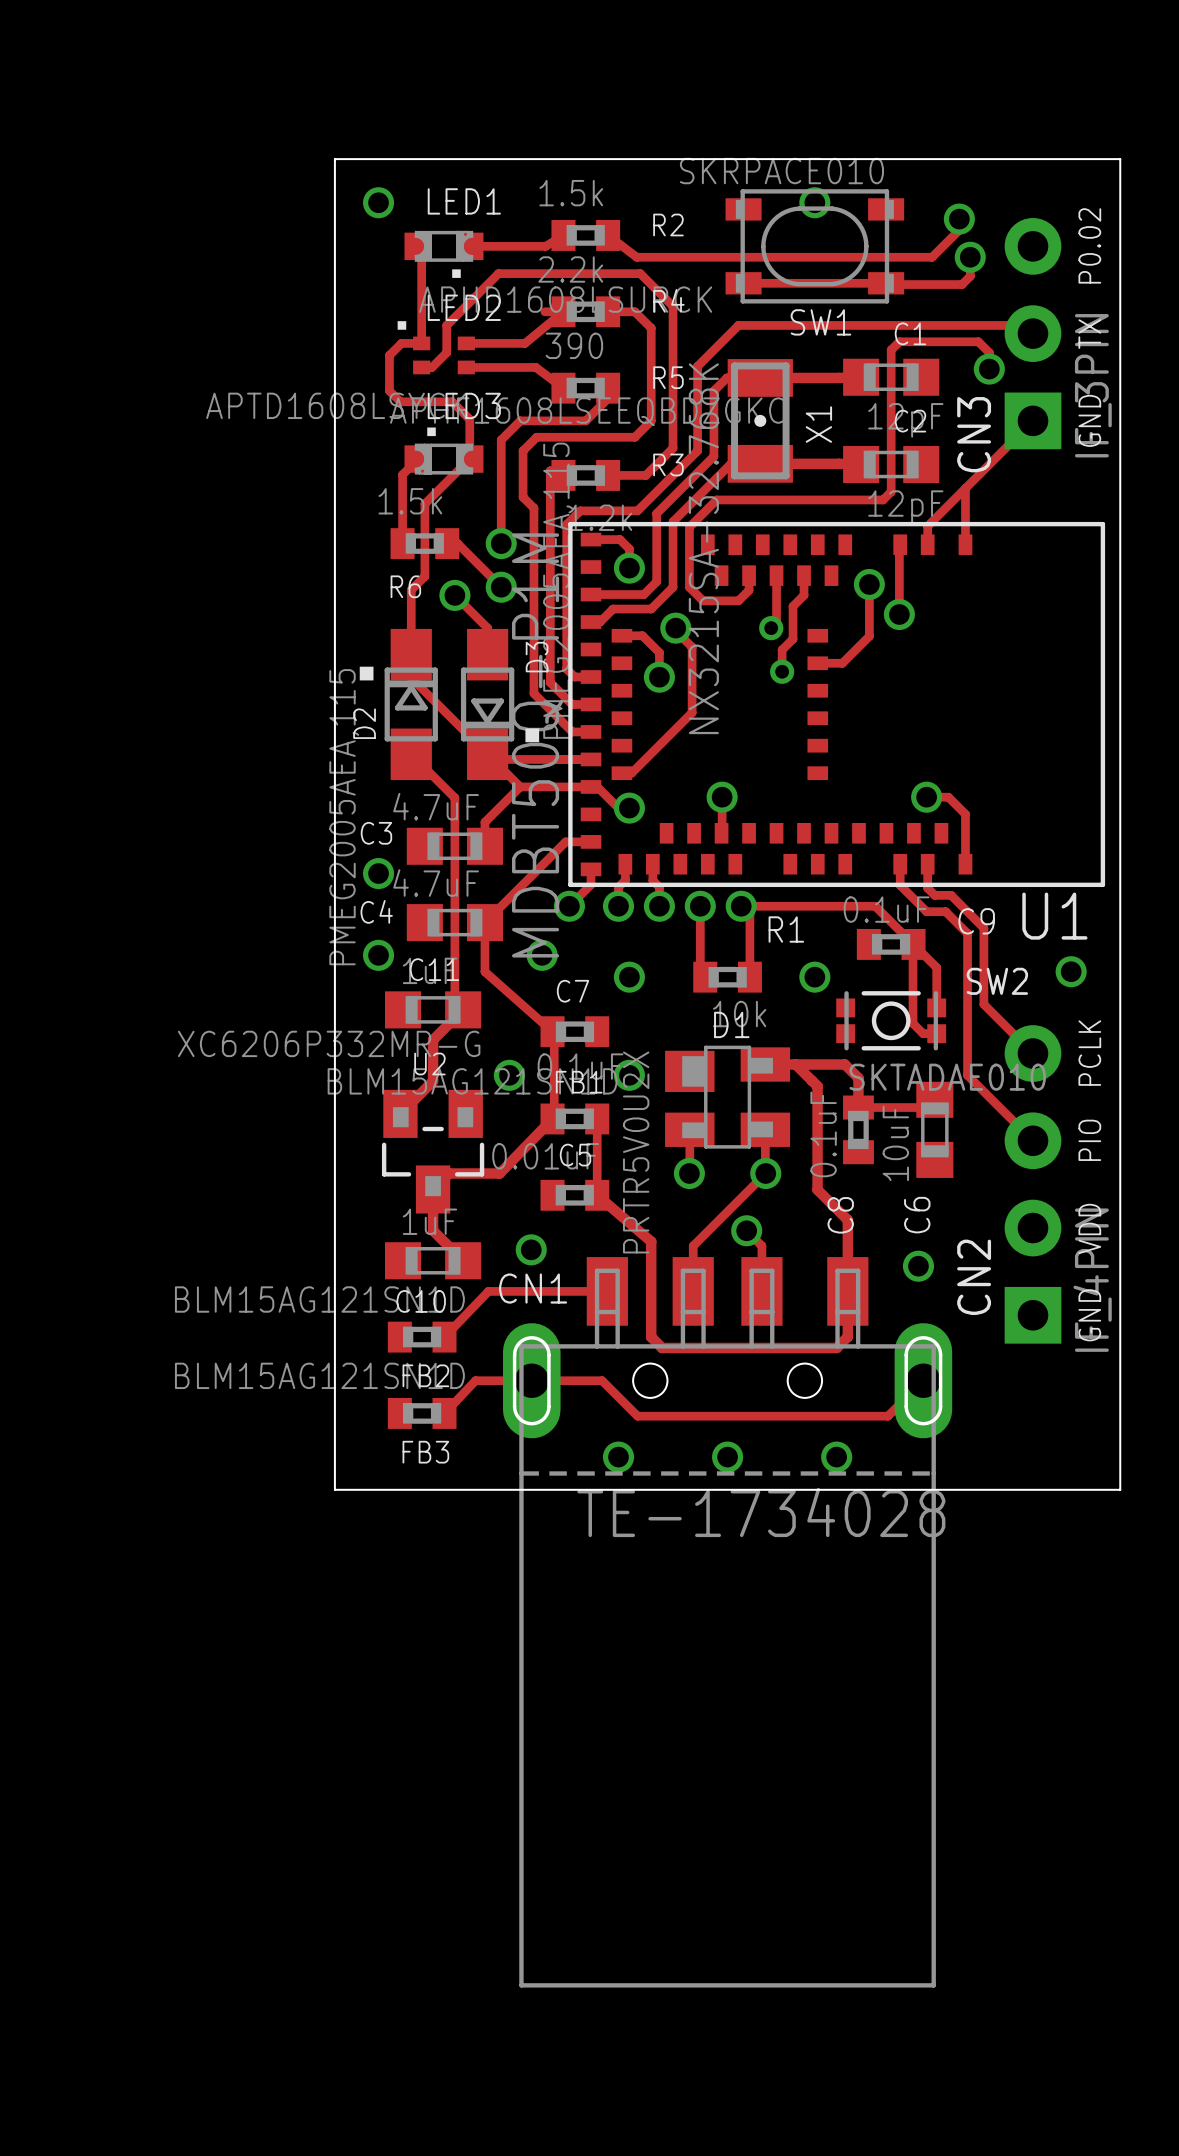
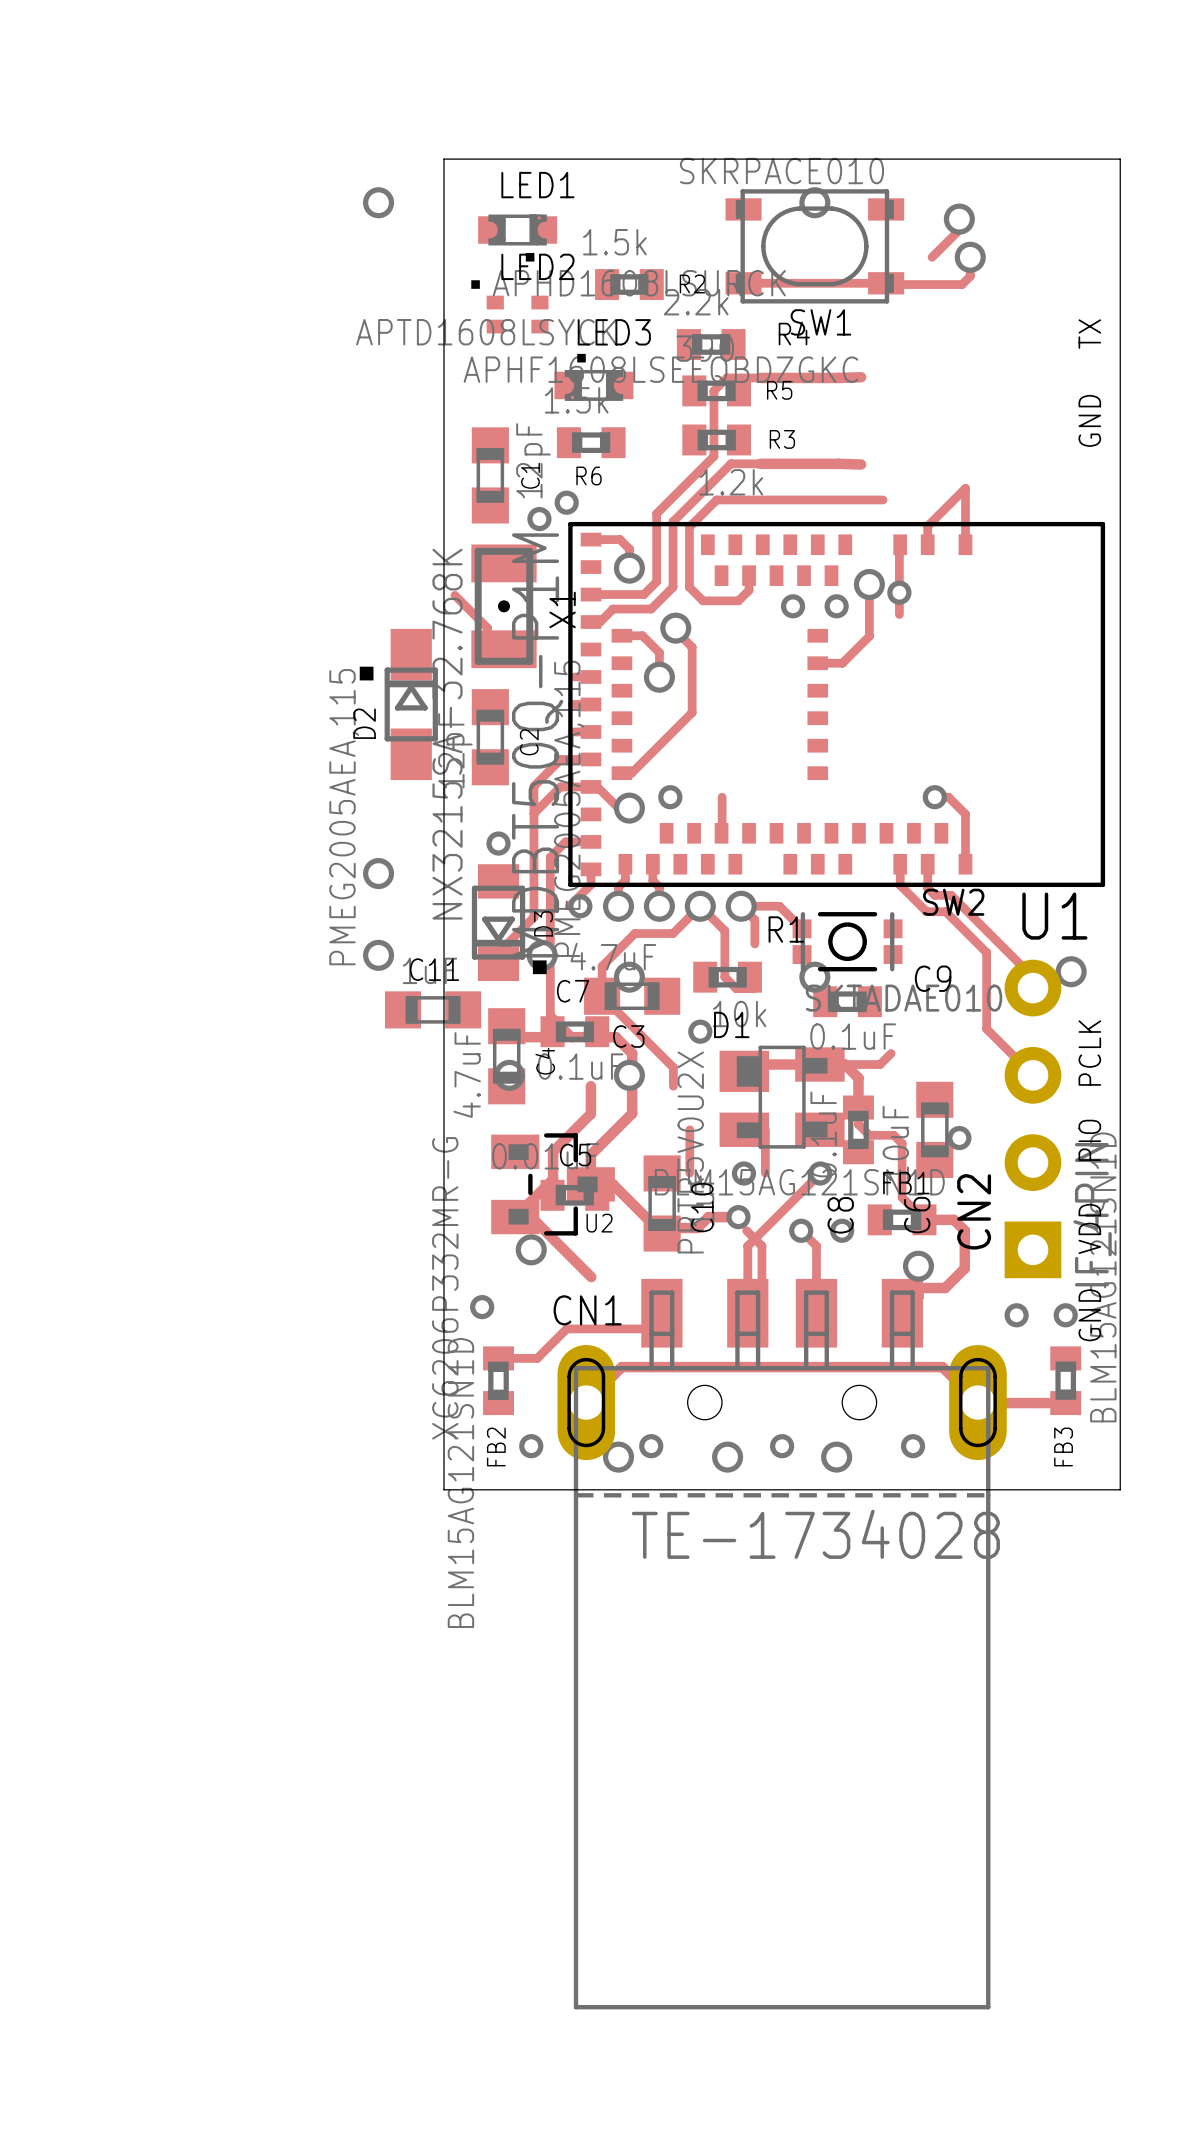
board edge: (443, 159) (334, 159) (334, 1489) (443, 1489) -> (443, 159) (443, 1489)
R2 name position: R2 (668, 224) -> R2 (692, 284)
track: (563, 235) (545, 246) (469, 246) -> none
R2 position: (585, 235) -> (629, 284)
track: (608, 235) (636, 257) (932, 257) -> none
text: P0.02 (1089, 245) -> none
track: (418, 246) (421, 249) (421, 343) (401, 343) (389, 355) (389, 390) (400, 401) (452, 401) (469, 419) (469, 459) (424, 503) (424, 576) (411, 589) (411, 677) (520, 786) -> none
LED1 position: (443, 254) -> (517, 238)
track: (544, 311) (563, 311) (524, 343) (466, 343) -> none
R4 position: (585, 311) -> (711, 344)
track: (608, 311) (634, 311) (651, 328) (651, 420) (634, 437) (536, 437) (523, 450) (523, 497) (533, 508) (533, 693) (572, 731) -> none
track: (1032, 333) (1024, 325) (738, 325) (697, 366) (697, 450) (637, 510) (580, 510) (566, 524) (566, 669) (574, 676) -> none
CN3: IF_3PIN (1032, 333) -> none
LED2 position: (436, 347) -> (509, 306)
track: (421, 367) (431, 367) (446, 352) (446, 325) (498, 273) (640, 273) (673, 306) (673, 448) (645, 475) (608, 475) -> none
track: (466, 367) (535, 367) (563, 388) -> none
track: (989, 369) (989, 352) (978, 341) (899, 341) (891, 349) (891, 491) (883, 499) -> none
via: (989, 369) -> none
R5 name position: R5 (668, 377) -> R5 (779, 390)
C1 rotation: 0° (891, 377) -> 90° clockwise (490, 475)
C1 position: (891, 377) -> (490, 475)
R5 position: (585, 388) -> (716, 390)
track: (608, 388) (614, 391) (585, 420) (520, 420) (501, 439) (501, 543) -> none
X1 position: (760, 420) -> (503, 606)
track: (1032, 420) (965, 488) -> none
LED3 position: (443, 451) -> (593, 377)
track: (418, 459) (402, 474) (402, 543) -> none
R3 name position: R3 (668, 464) -> R3 (782, 439)
C2 rotation: 0° (891, 464) -> 90° clockwise (490, 737)
C2 position: (891, 464) -> (490, 737)
track: (563, 475) (550, 470) (550, 682) (572, 704) -> none
R3 position: (585, 475) -> (716, 439)
via: none -> (566, 502)
via: none -> (539, 519)
R6 position: (424, 543) -> (591, 442)
track: (447, 543) (457, 543) (501, 587) -> none
via: (501, 543) -> none
track: (776, 575) (776, 622) (771, 628) -> none
track: (804, 575) (804, 595) (793, 606) (793, 639) (782, 649) (782, 671) -> none
R6 name position: R6 (405, 586) -> R6 (589, 475)
via: (501, 587) -> none
via: (454, 595) -> none
via: none -> (836, 606)
via position: (899, 614) -> (899, 592)
D3 footprint: [460, 628, 540, 781] -> [471, 864, 547, 982]
via position: (771, 628) -> (793, 606)
via: (782, 671) -> none
track: (411, 754) (454, 797) (454, 1001) (463, 1009) (433, 1039) (433, 1081) (400, 1113) -> none
track: (492, 759) (560, 759) -> (498, 963) (503, 947) (533, 917) (533, 786) (560, 759)
via size: [911, 781, 943, 813] -> [922, 785, 947, 810]
track: (520, 786) (560, 786) -> (533, 813) (560, 786)
track: (520, 786) (484, 822) (484, 846) -> none
via: none -> (670, 797)
via: (722, 797) -> none
C3 name position: C3 (376, 833) -> C3 (628, 1036)
via: none -> (498, 843)
C3 position: (454, 846) -> (632, 996)
track: (550, 857) (484, 922) (484, 971) (552, 1031) (554, 1041) (554, 1117) (499, 1173) (449, 1173) (433, 1189) (433, 1230) (463, 1260) -> (550, 857) (550, 1015) (572, 1037)
via size: [553, 890, 585, 922] -> [568, 894, 593, 919]
track: (700, 906) (700, 975) (705, 977) -> none
track: (779, 906) (875, 906) (936, 967) (936, 1007) -> (779, 906) (802, 928)
C9 value position: 0.1uF (886, 909) -> 0.1uF (853, 1036)
C4 name position: C4 (376, 911) -> C4 (545, 1061)
track: (749, 914) (749, 977) -> (749, 914) (754, 919) (754, 943)
C4 rotation: 0° (454, 922) -> 90° clockwise (506, 1056)
C4 position: (454, 922) -> (506, 1056)
track: (983, 928) (983, 1004) (1032, 1053) -> (983, 928) (1032, 977) (1032, 988)
track: (967, 933) (967, 1075) (1032, 1140) -> (967, 933) (986, 952) (986, 1028) (1032, 1075)
C9 position: (891, 944) -> (847, 1001)
track: (913, 944) (913, 1023) (923, 1033) (936, 1033) -> none
track: none -> (754, 988) (736, 988) (724, 977) (724, 930) (700, 906) (673, 933) (634, 933) (602, 966) (602, 996) (673, 1067) (673, 1086)
SW2 position: (891, 1020) -> (847, 941)
track: none -> (506, 1026) (517, 1037) (615, 1037) (632, 1053) (632, 1113) (590, 1154) (590, 1184) (612, 1184) (662, 1233) (667, 1228) (697, 1228) (708, 1217) (738, 1217)
via: none -> (700, 1031)
track: none -> (891, 1053) (880, 1064) (844, 1064)
U2 name position: U2 (429, 1063) -> U2 (599, 1223)
track: (795, 1064) (817, 1086) (817, 1189) (847, 1220) (847, 1336) (836, 1348) (662, 1348) (651, 1337) (651, 1241) (597, 1195) -> none
track: none -> (590, 1086) (590, 1113) (553, 1151) (553, 1179) (515, 1217) (531, 1217) (591, 1277)
D1 position: (727, 1097) -> (782, 1097)
track: (855, 1099) (858, 1107) (927, 1107) (934, 1099) -> none
track: none -> (858, 1107) (858, 1124) (869, 1135) (893, 1135) (902, 1143) (902, 1197) (924, 1219) (953, 1219) (964, 1230) (964, 1268) (945, 1288) (918, 1288) (918, 1297) (902, 1313)
FB1 position: (574, 1118) -> (902, 1219)
track: (597, 1118) (597, 1195) -> none
via: none -> (959, 1138)
U2 rotation: 0° (433, 1151) -> 90° counterclockwise (553, 1184)
U2 position: (433, 1151) -> (553, 1184)
via: (689, 1173) -> none
track: (765, 1173) (693, 1246) (693, 1291) -> none
via position: (765, 1173) -> (743, 1173)
track: none -> (820, 1173) (747, 1246) (747, 1313)
via: none -> (820, 1173)
CN2 position: (1032, 1184) -> (1032, 1118)
via position: (746, 1230) -> (738, 1217)
track: none -> (801, 1230) (816, 1246) (816, 1313)
via: none -> (801, 1230)
via: none -> (842, 1230)
C10 rotation: 0° (433, 1260) -> 90° clockwise (662, 1203)
C10 position: (433, 1260) -> (662, 1203)
track: (607, 1291) (488, 1291) (444, 1337) -> none
FB2 value position: BLM15AG121SN1D (319, 1299) -> BLM15AG121SN1D (460, 1483)
via: none -> (482, 1307)
track: none -> (661, 1313) (646, 1328) (566, 1328) (537, 1358) (498, 1358)
via: none -> (1016, 1315)
via: none -> (1065, 1315)
FB2 rotation: 0° (422, 1337) -> 90° clockwise (498, 1380)
FB2 position: (422, 1337) -> (498, 1380)
track: (923, 1380) (887, 1416) (637, 1416) (602, 1380) (475, 1380) (444, 1413) -> none
track: none -> (586, 1402) (621, 1367) (942, 1367) (978, 1403) (1065, 1403)
FB3 rotation: 0° (422, 1413) -> 90° clockwise (1065, 1380)
FB3 position: (422, 1413) -> (1065, 1380)
via: none -> (531, 1446)
via: none -> (651, 1446)
via: none -> (782, 1446)
via: none -> (913, 1446)
CN1 position: (727, 1622) -> (782, 1644)

